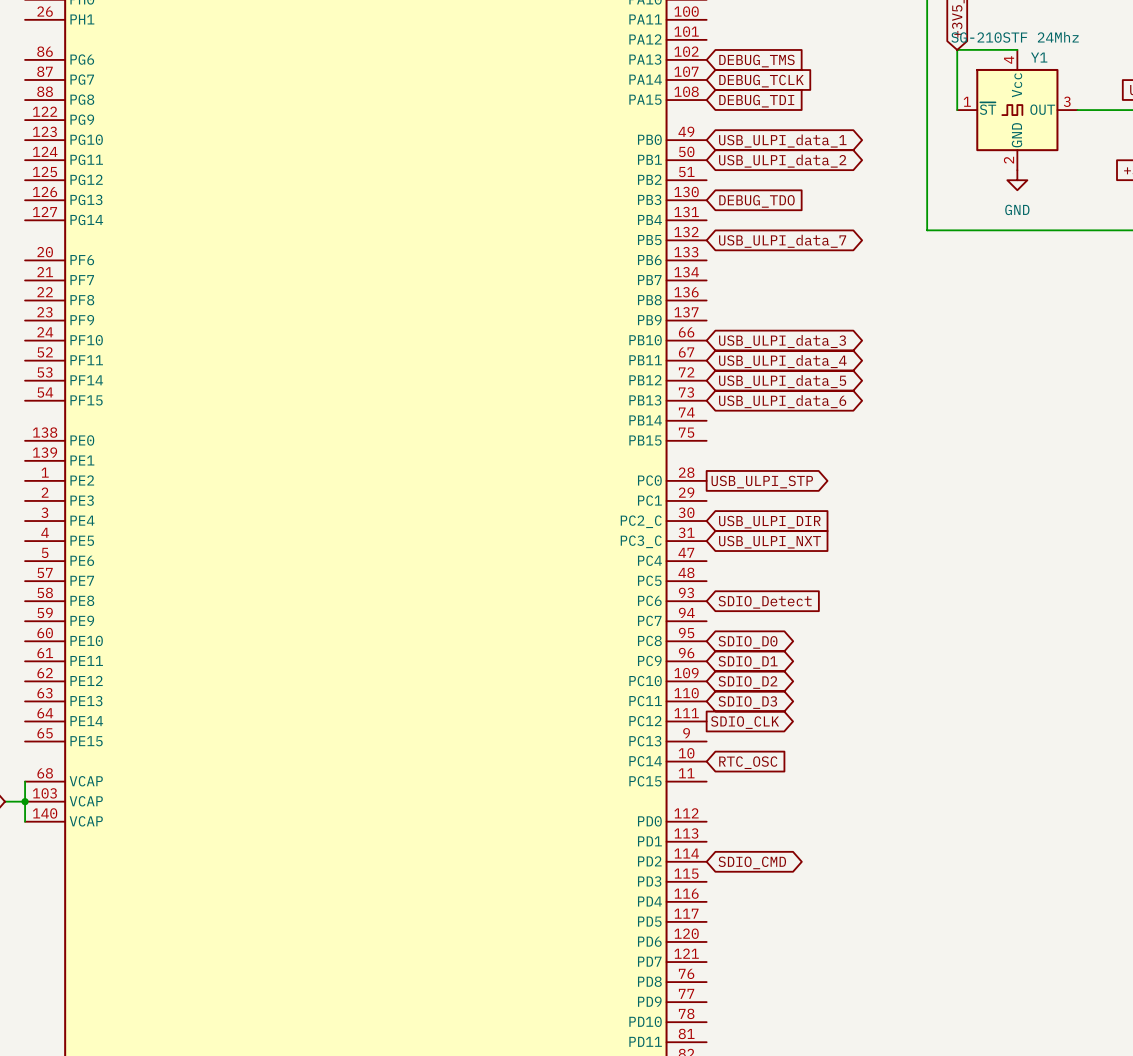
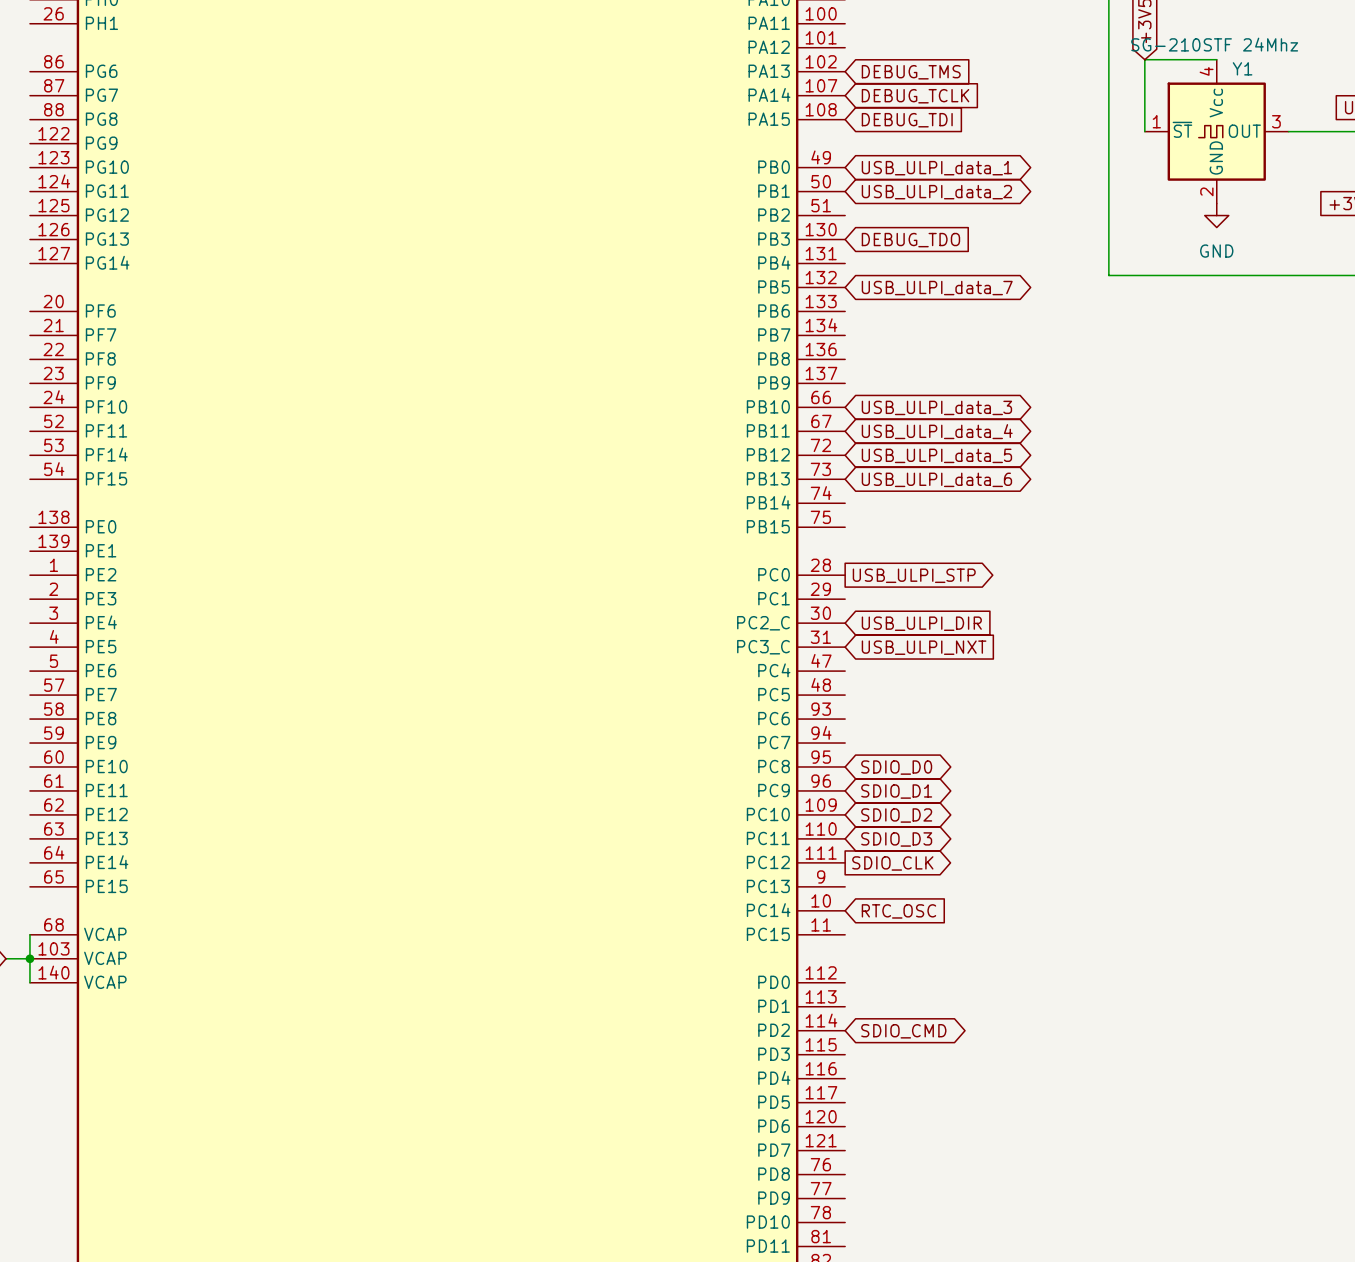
global label: SDIO_Detect (765, 602) -> none

